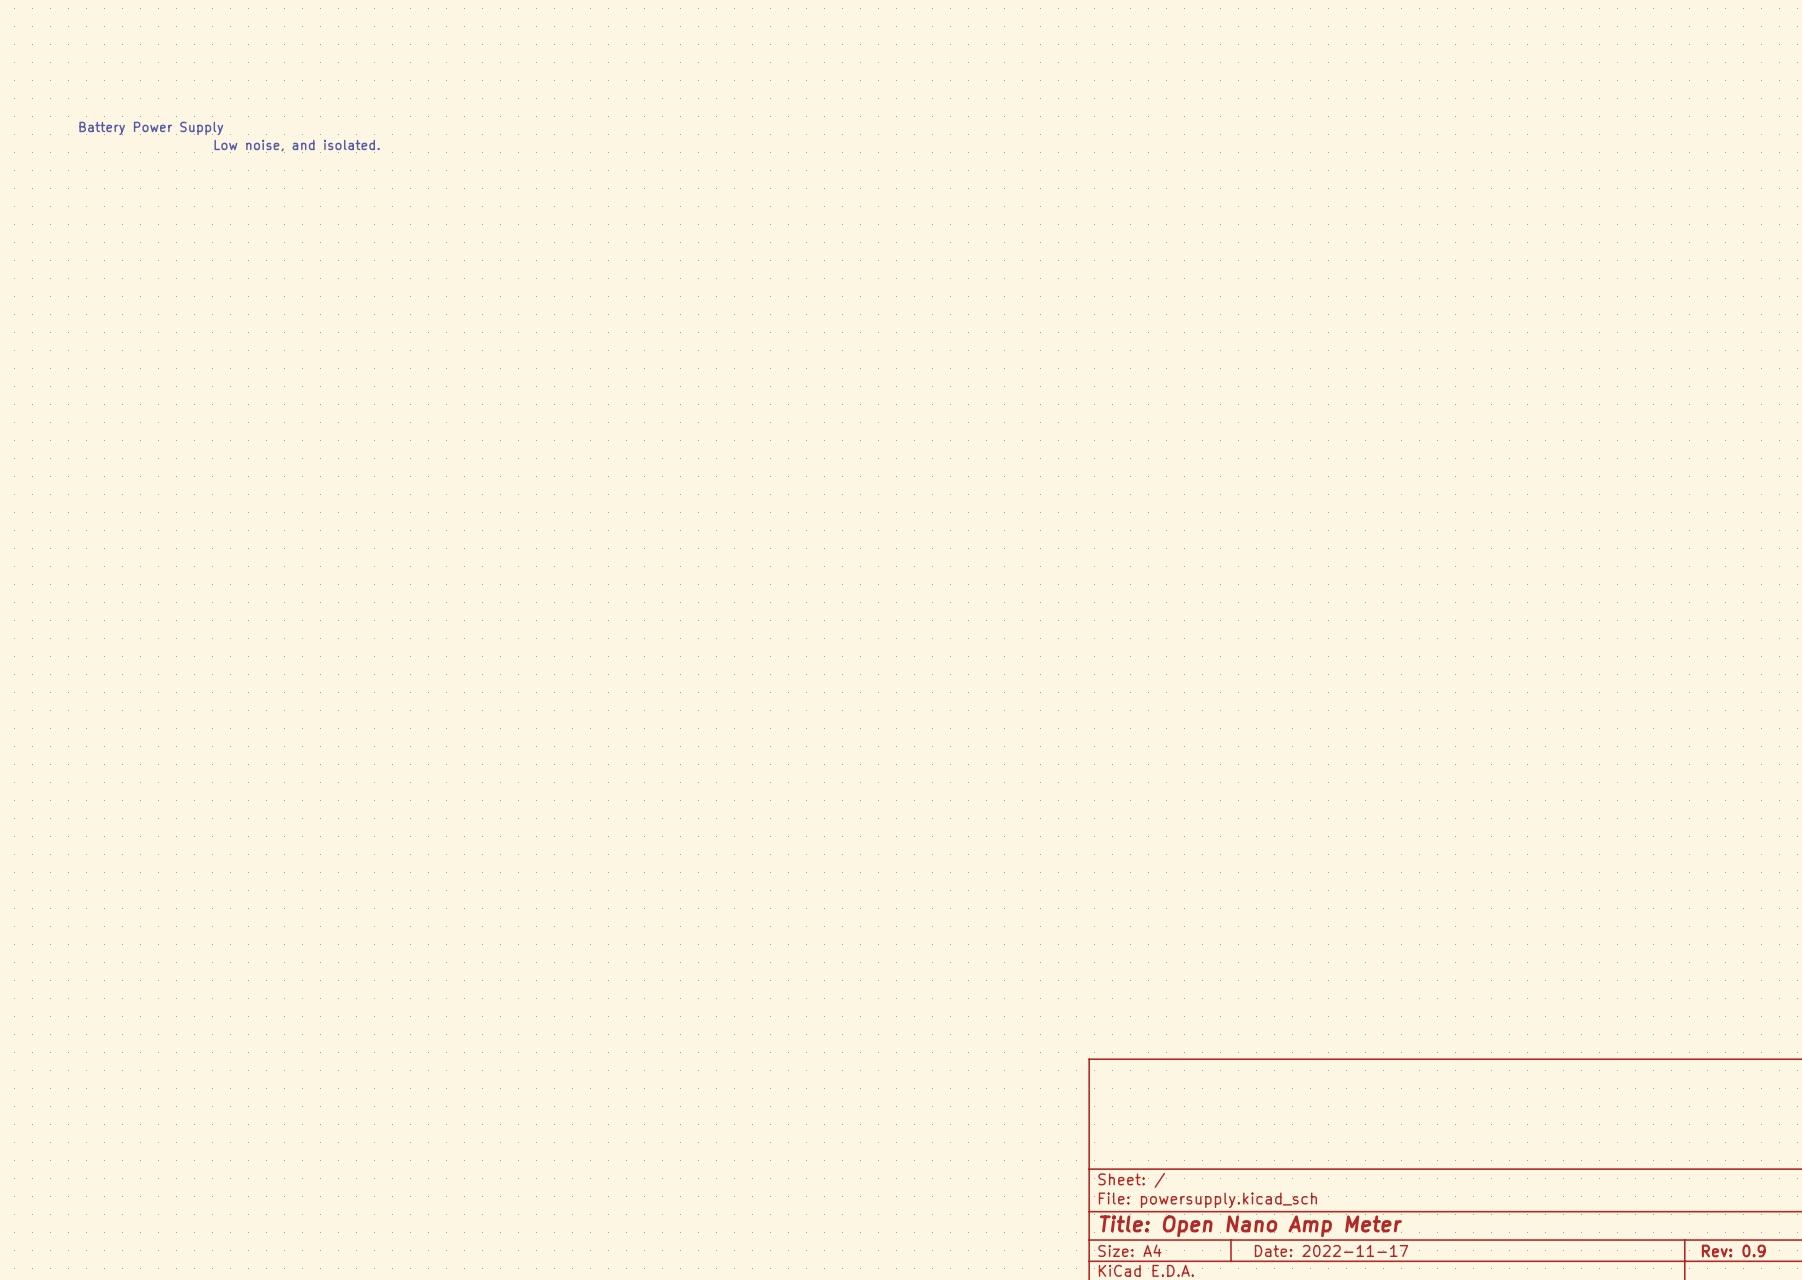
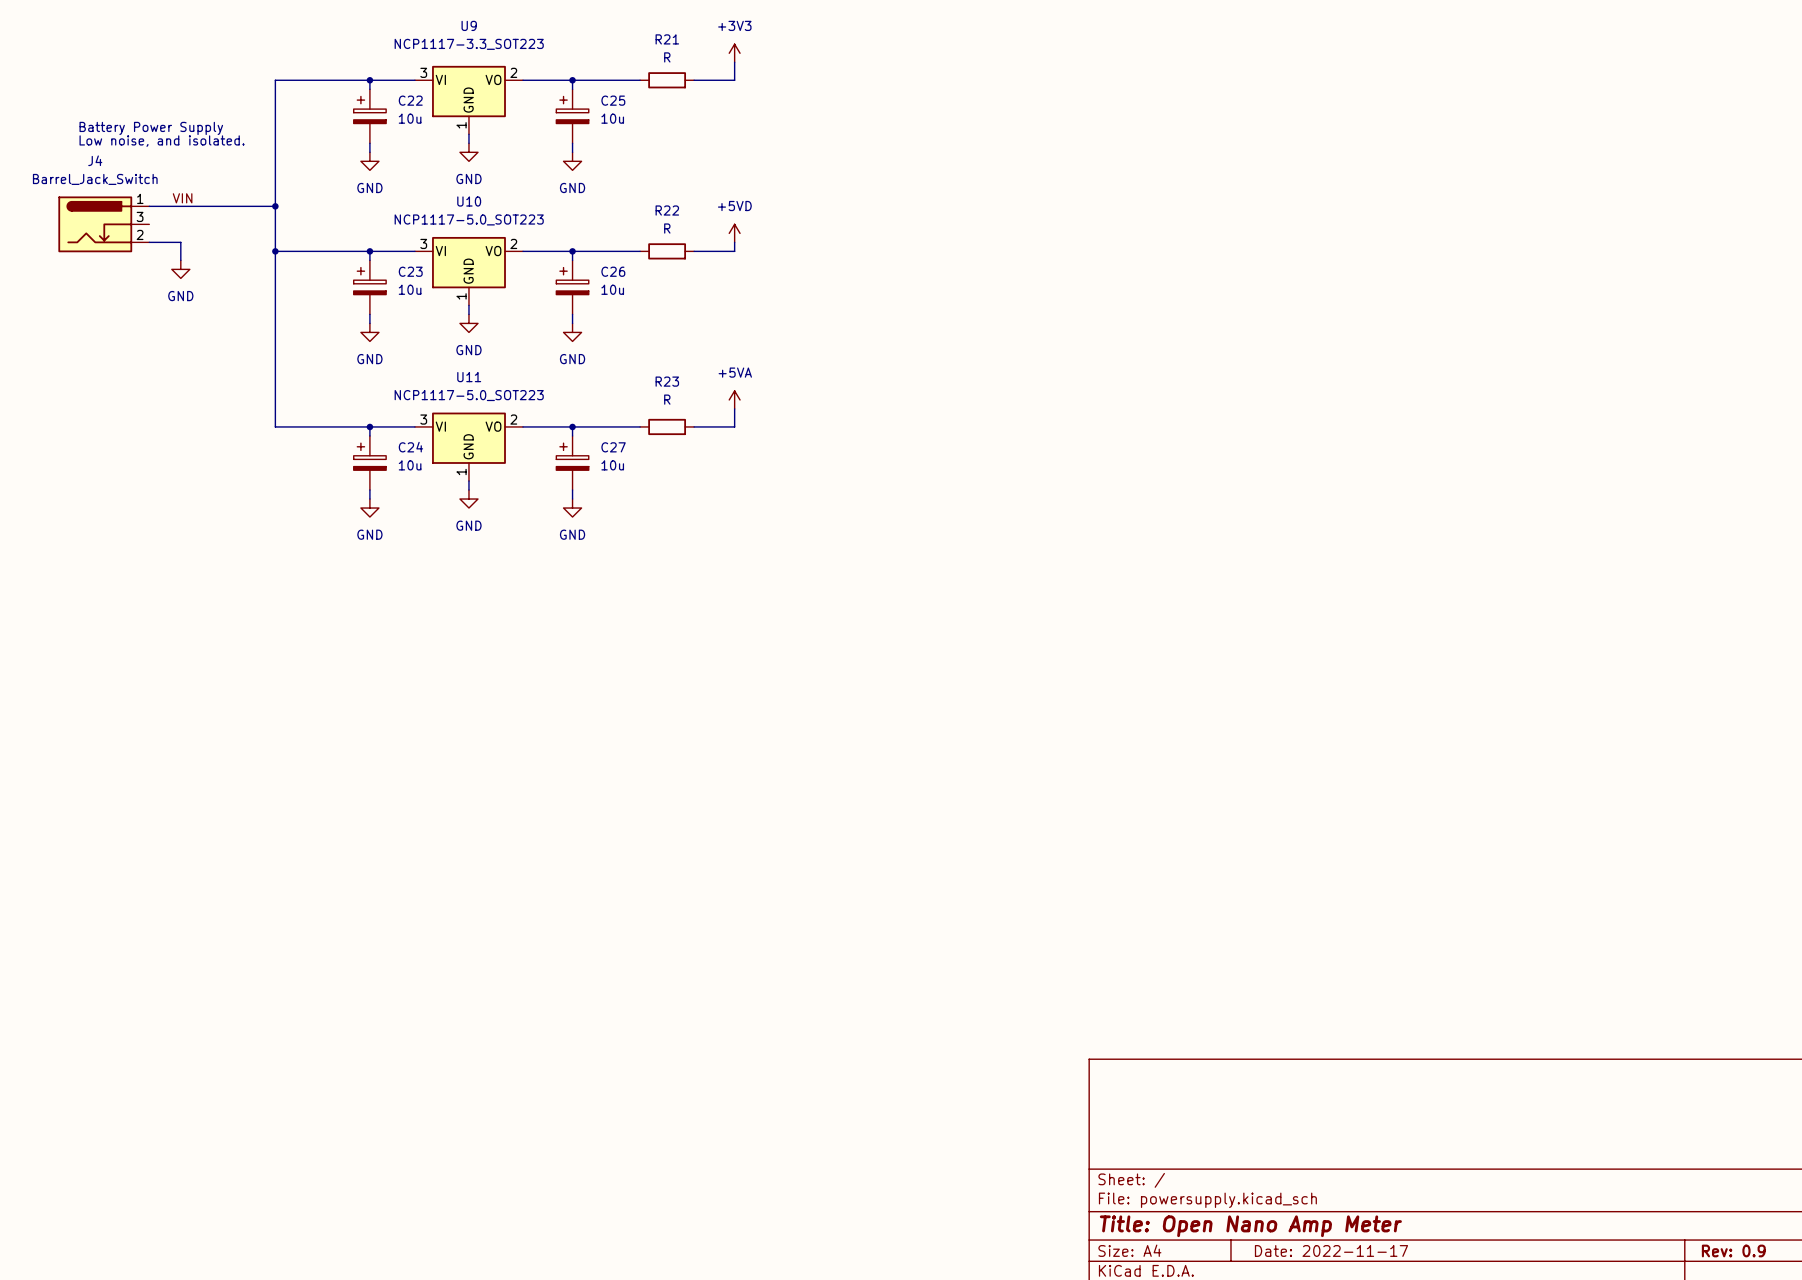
power symbol: none -> +3V3 (734, 53)
wire: none -> (734, 62) (734, 80) (694, 80)
wire: none -> (369, 80) (369, 89)
junction: none -> (369, 80)
wire: none -> (414, 80) (275, 80) (275, 426) (414, 426)
wire: none -> (523, 80) (640, 80)
wire: none -> (572, 80) (572, 89)
junction: none -> (572, 80)
R21: none -> R (667, 80)
U9: none -> NCP1117-3.3_SOT223 (468, 100)
C22: none -> 10u (369, 116)
C25: none -> 10u (572, 116)
wire: none -> (468, 134) (468, 143)
wire: none -> (369, 143) (369, 152)
wire: none -> (572, 143) (572, 152)
text position: Low noise, and isolated. (297, 145) -> Low noise, and isolated. (162, 141)
power symbol: none -> GND (468, 152)
power symbol: none -> GND (369, 161)
power symbol: none -> GND (572, 161)
label: none -> VIN (182, 198)
wire: none -> (149, 206) (275, 206)
junction: none -> (275, 206)
J4: none -> Barrel_Jack_Switch (103, 224)
power symbol: none -> +5VD (734, 233)
wire: none -> (149, 242) (180, 242) (180, 260)
wire: none -> (734, 242) (734, 251) (694, 251)
wire: none -> (275, 251) (414, 251)
junction: none -> (275, 251)
wire: none -> (369, 251) (369, 260)
junction: none -> (369, 251)
wire: none -> (523, 251) (640, 251)
wire: none -> (572, 251) (572, 260)
junction: none -> (572, 251)
R22: none -> R (667, 251)
power symbol: none -> GND (180, 269)
U10: none -> NCP1117-5.0_SOT223 (468, 271)
C23: none -> 10u (369, 287)
C26: none -> 10u (572, 287)
wire: none -> (468, 305) (468, 314)
wire: none -> (369, 314) (369, 323)
wire: none -> (572, 314) (572, 323)
power symbol: none -> GND (468, 323)
power symbol: none -> GND (369, 332)
power symbol: none -> GND (572, 332)
power symbol: none -> +5VA (734, 399)
wire: none -> (734, 408) (734, 426) (694, 426)
wire: none -> (369, 426) (369, 435)
junction: none -> (369, 426)
wire: none -> (523, 426) (640, 426)
wire: none -> (572, 426) (572, 435)
junction: none -> (572, 426)
R23: none -> R (667, 426)
U11: none -> NCP1117-5.0_SOT223 (468, 446)
C24: none -> 10u (369, 462)
C27: none -> 10u (572, 462)
wire: none -> (468, 481) (468, 490)
wire: none -> (369, 490) (369, 499)
wire: none -> (572, 490) (572, 499)
power symbol: none -> GND (468, 499)
power symbol: none -> GND (369, 508)
power symbol: none -> GND (572, 508)

